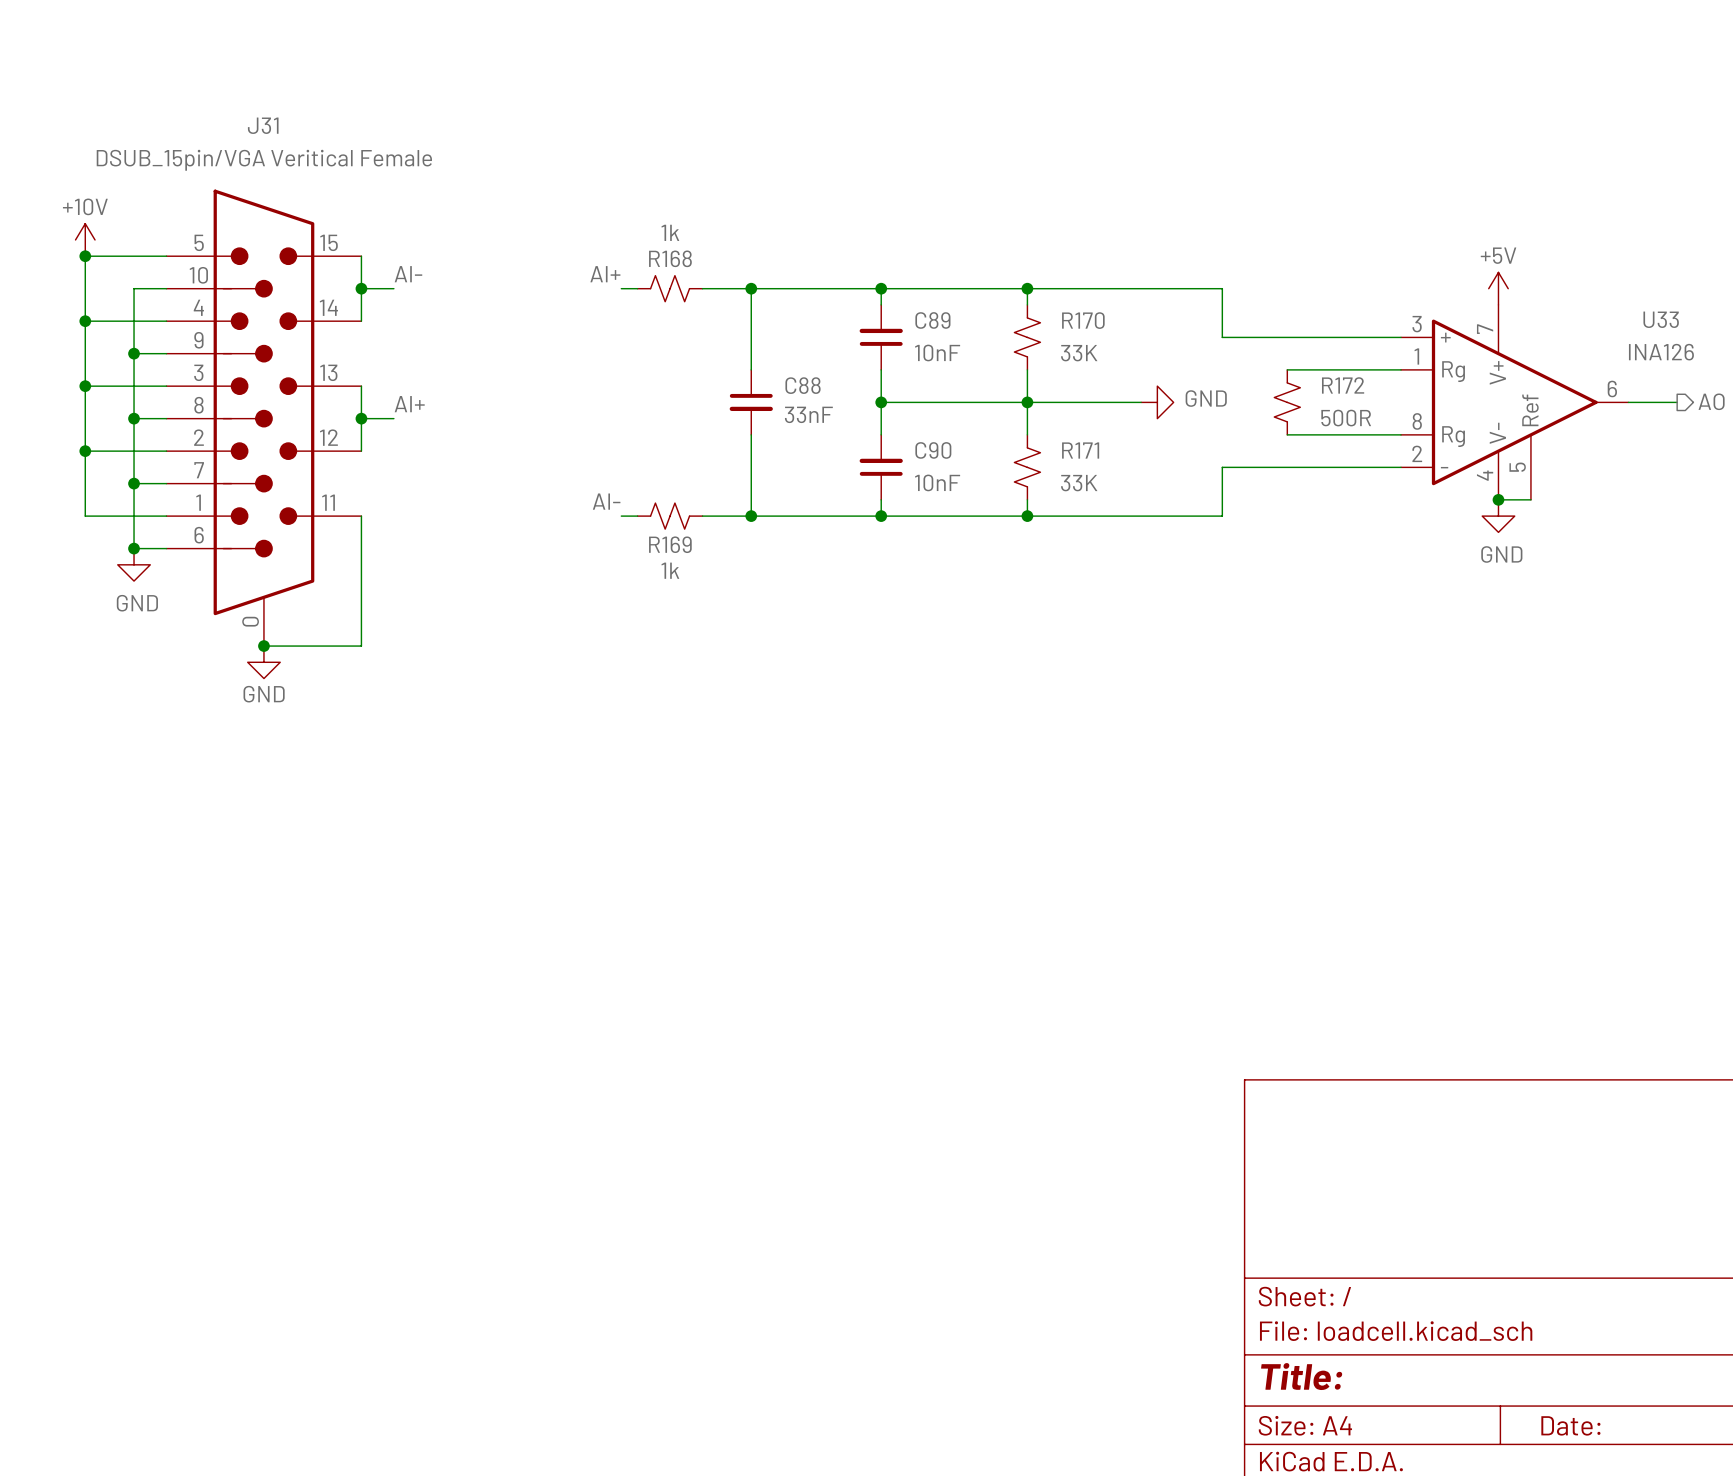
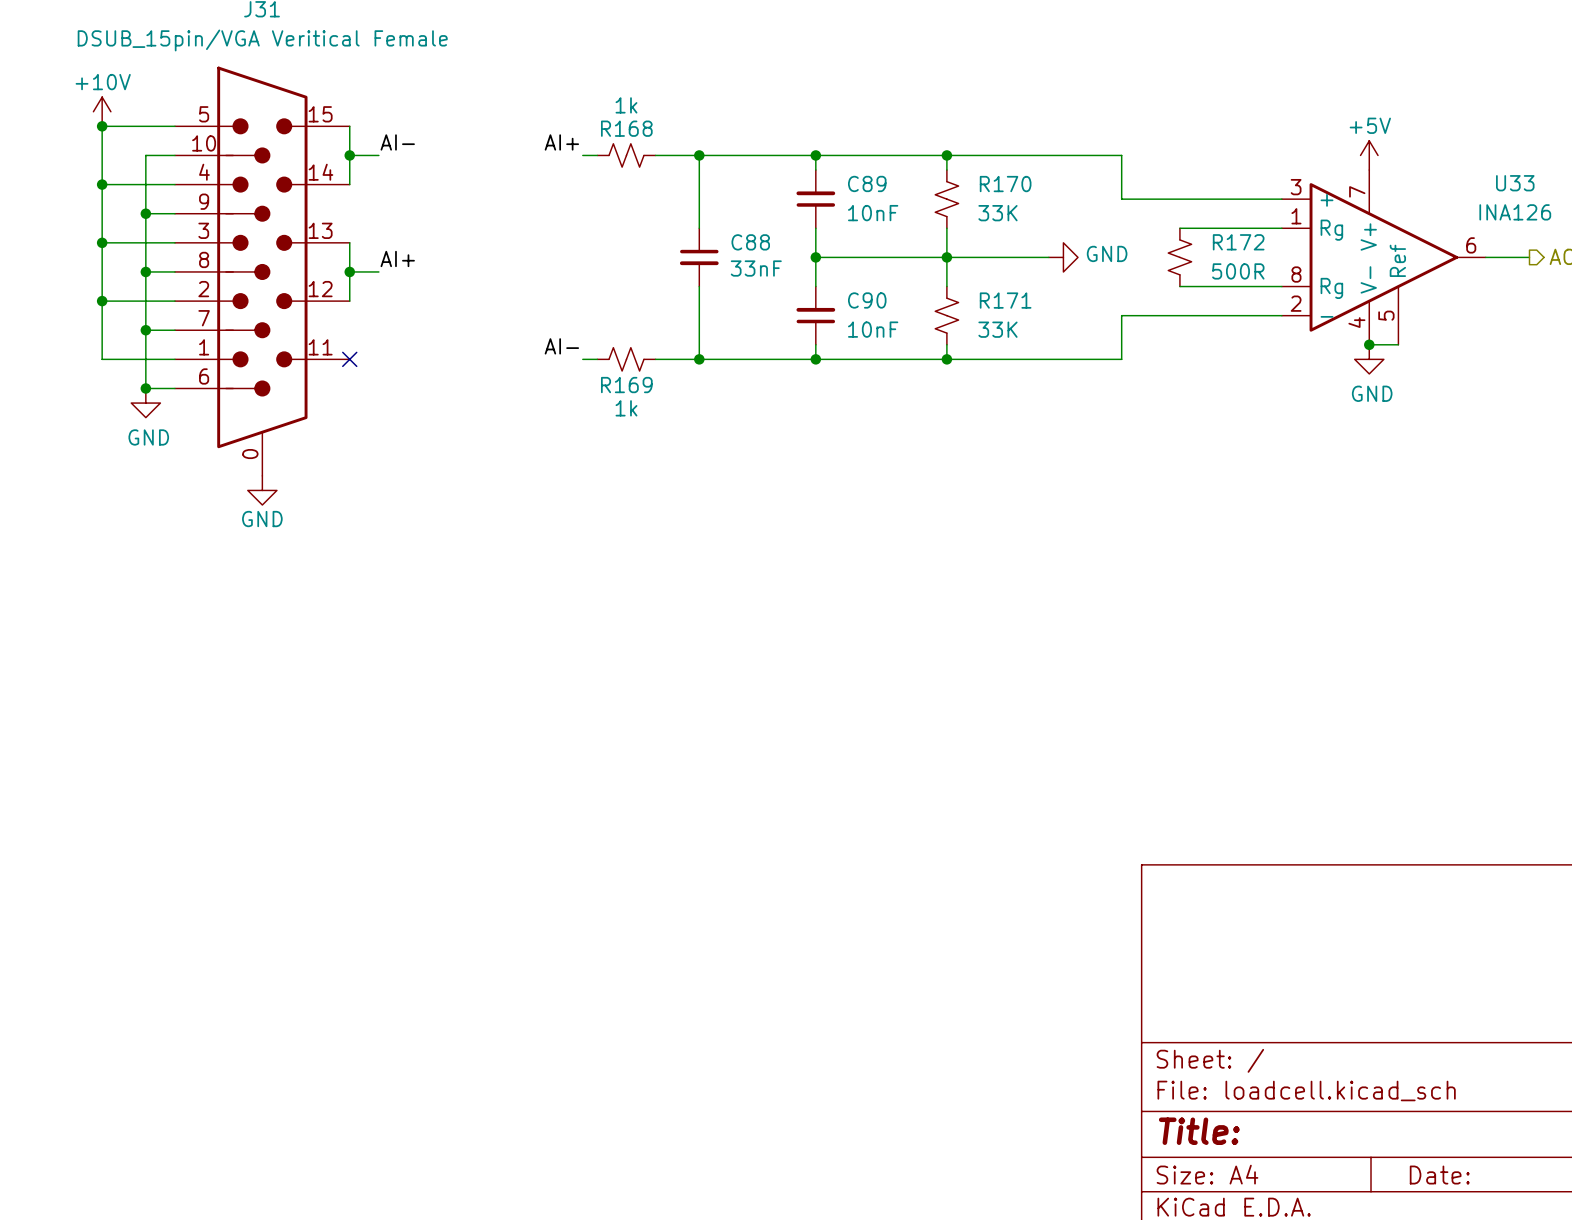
wire: (361, 516) (361, 646) (263, 646) -> none
no-connect mark: none -> (349, 359)
junction: (263, 646) -> none

